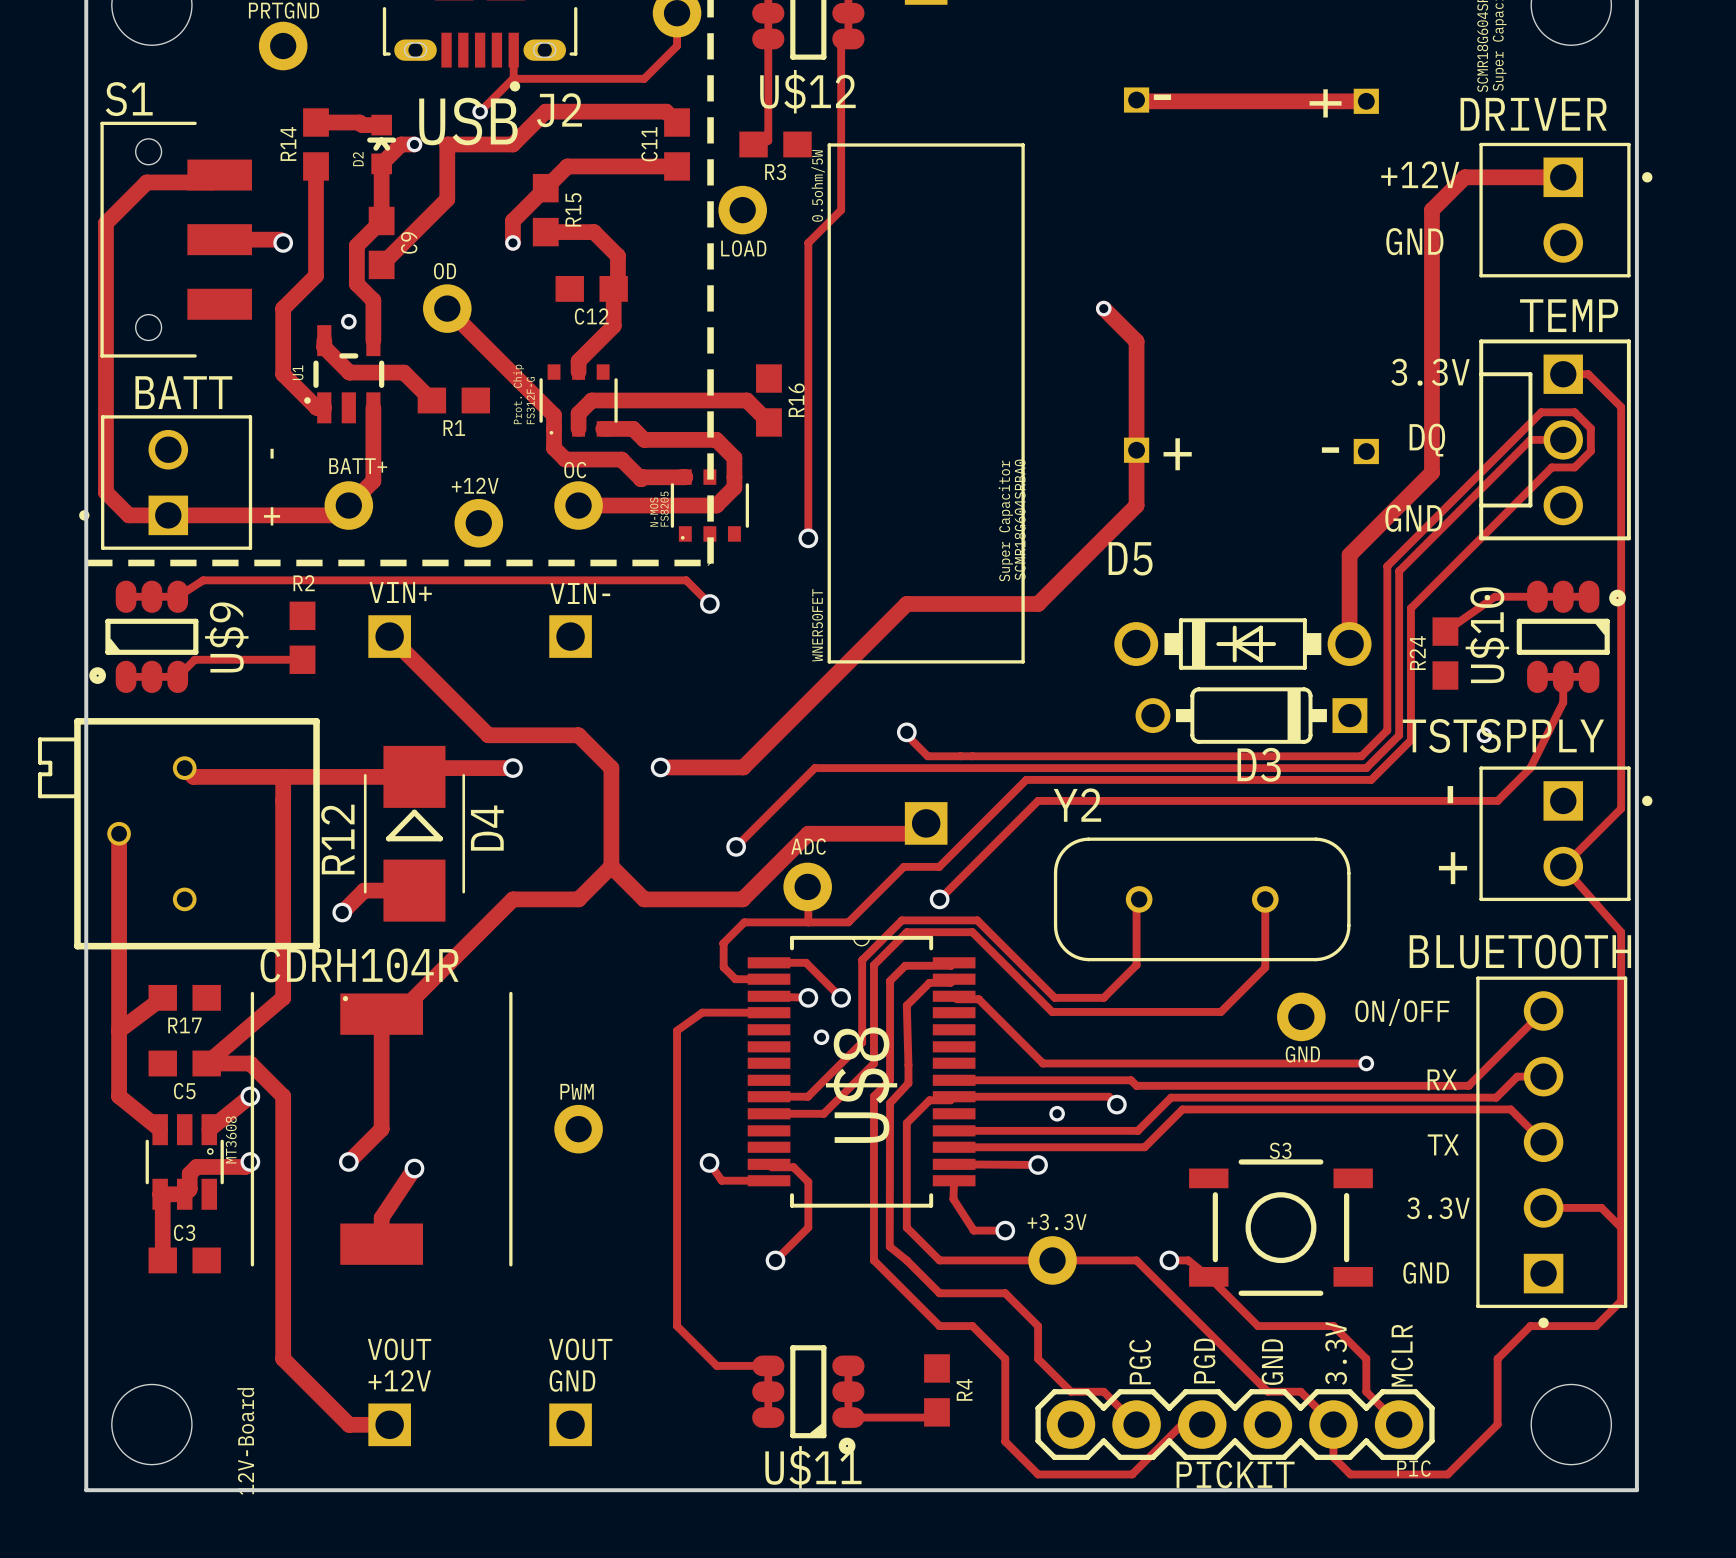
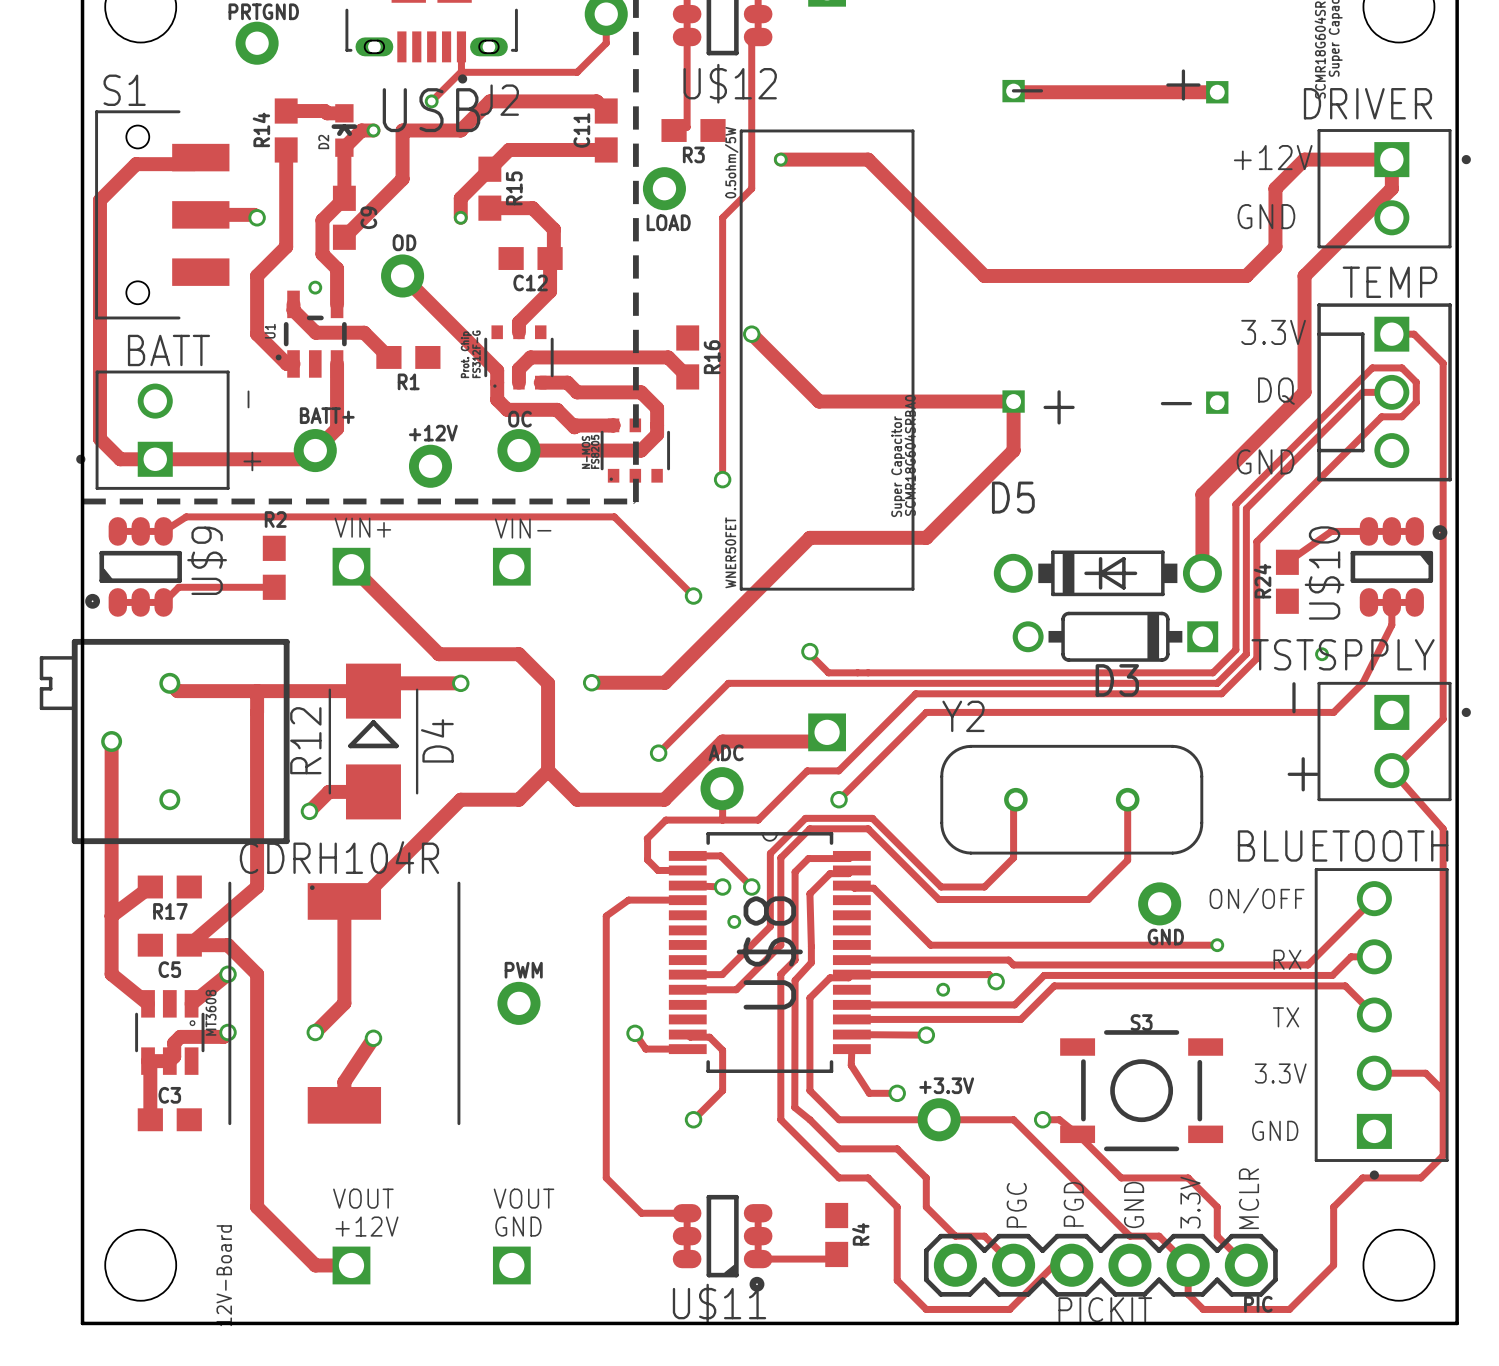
track: none -> (780, 159) (868, 159) (984, 275) (1246, 275) (1275, 246)
via: none -> (780, 159)
track: (1431, 275) (1431, 472) -> (1391, 159) (1391, 188) (1304, 275) (1304, 392) (1275, 421)
track: (1103, 308) (1136, 341) (1136, 450) -> (751, 334) (819, 401) (1013, 401)
via: (1103, 308) -> none
via: none -> (751, 334)
track: none -> (635, 537) (693, 596)
via position: (709, 603) -> (693, 596)

